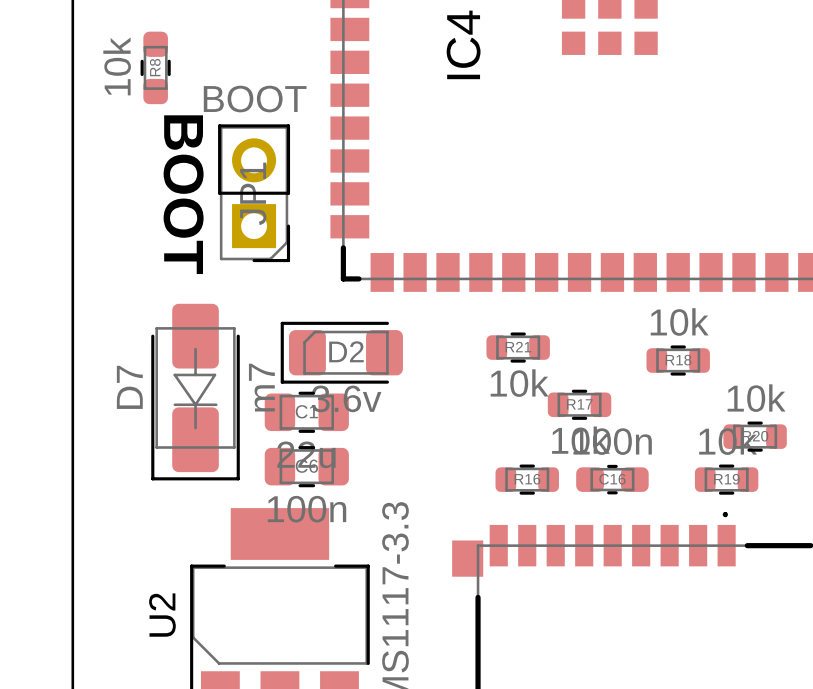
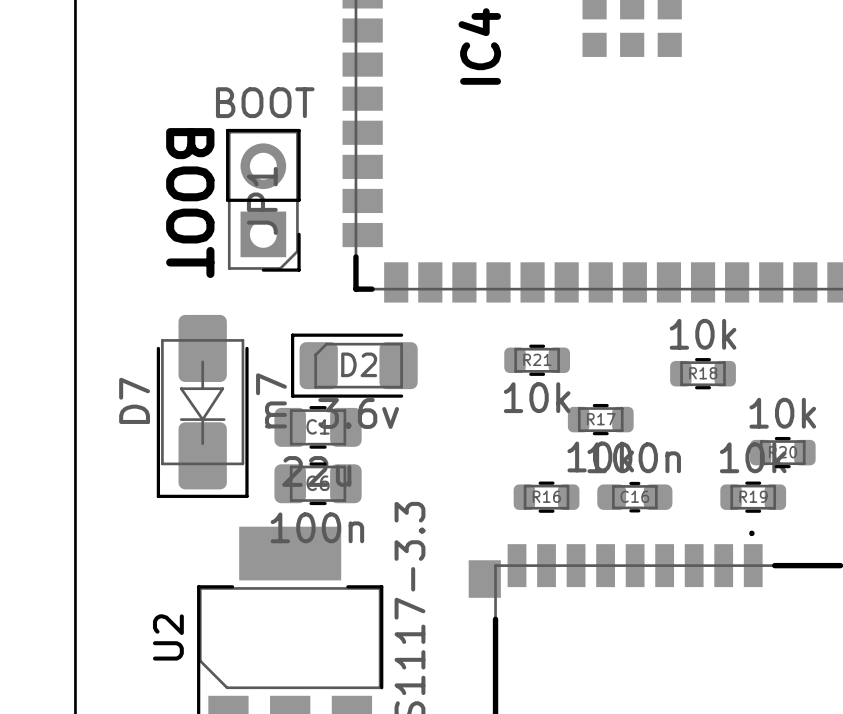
R8: 10k (155, 67) -> none

